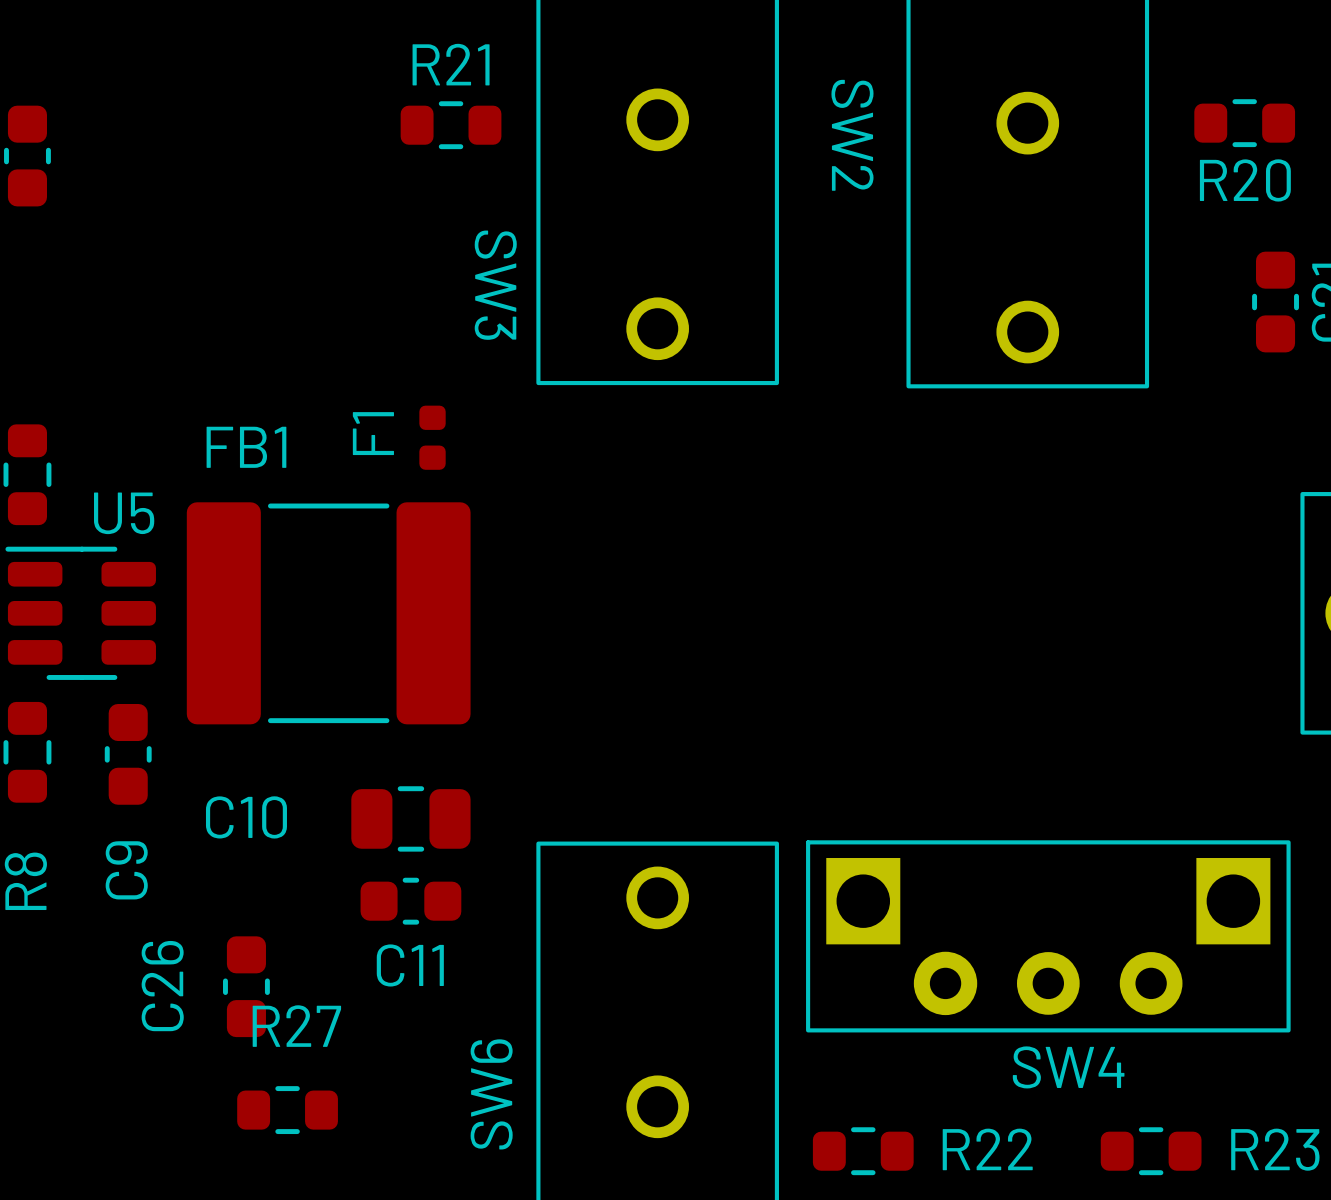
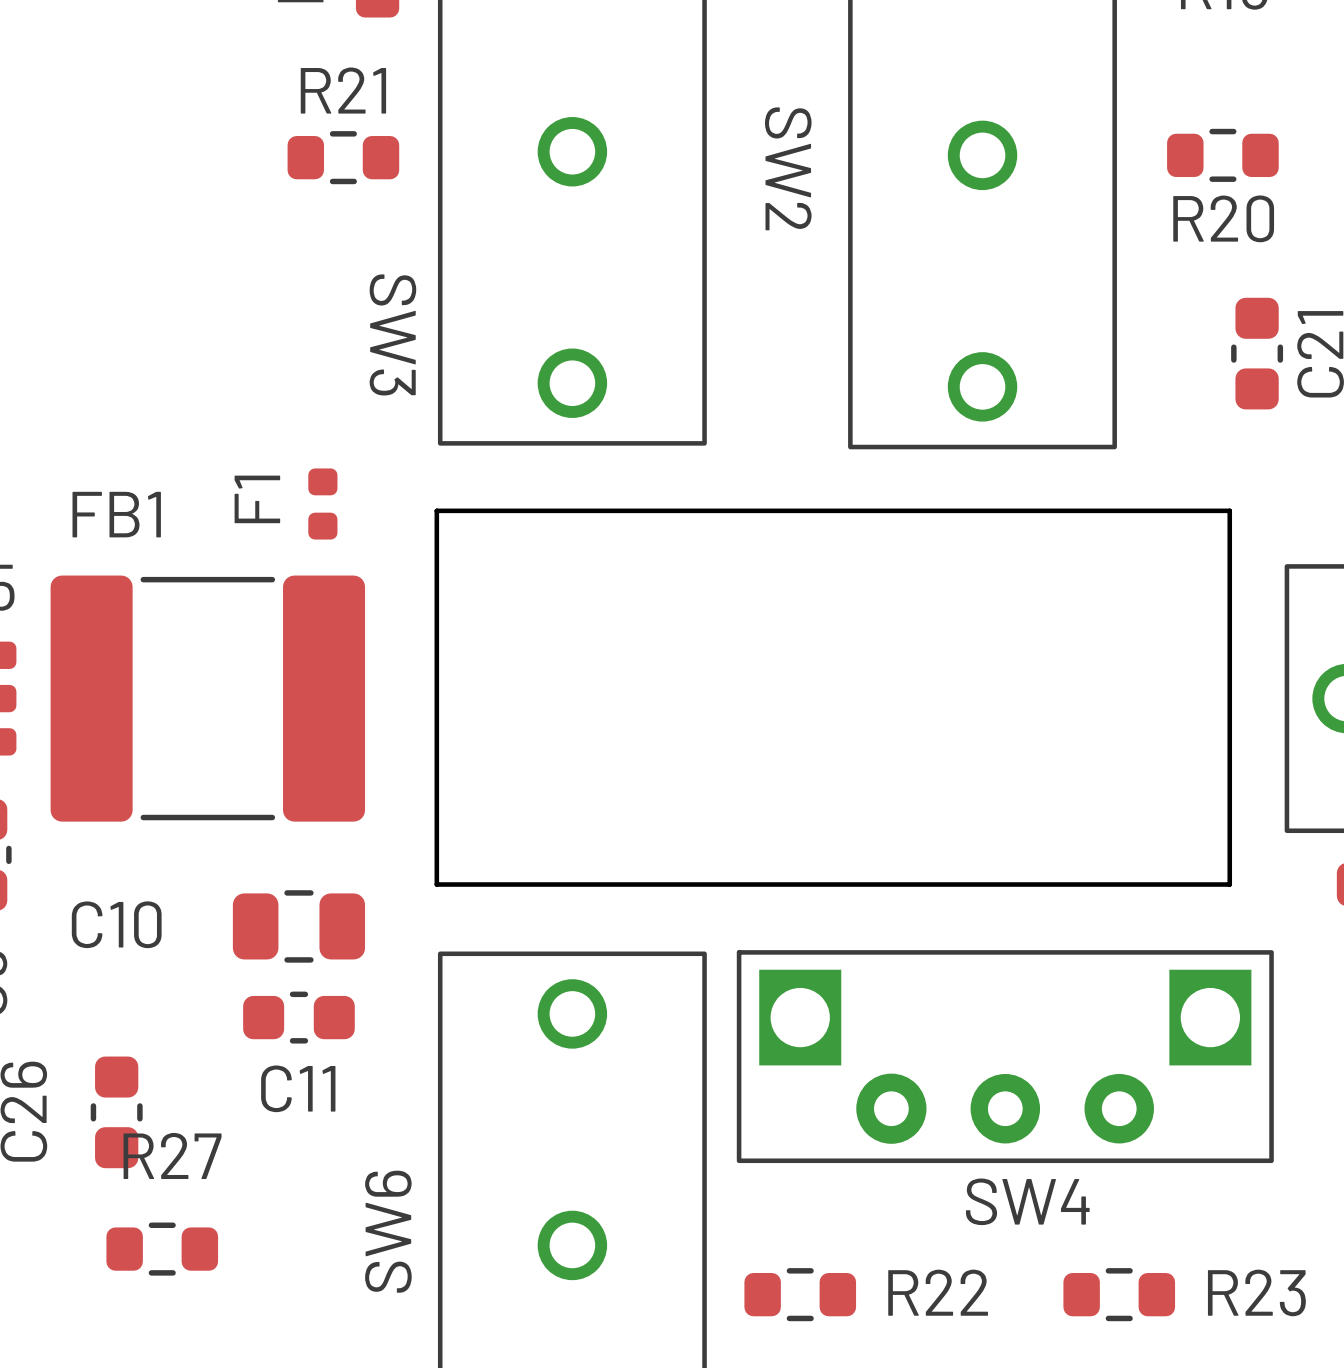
board edge: none -> (436, 510) (1229, 510) (1229, 884) (436, 884) (436, 510)

